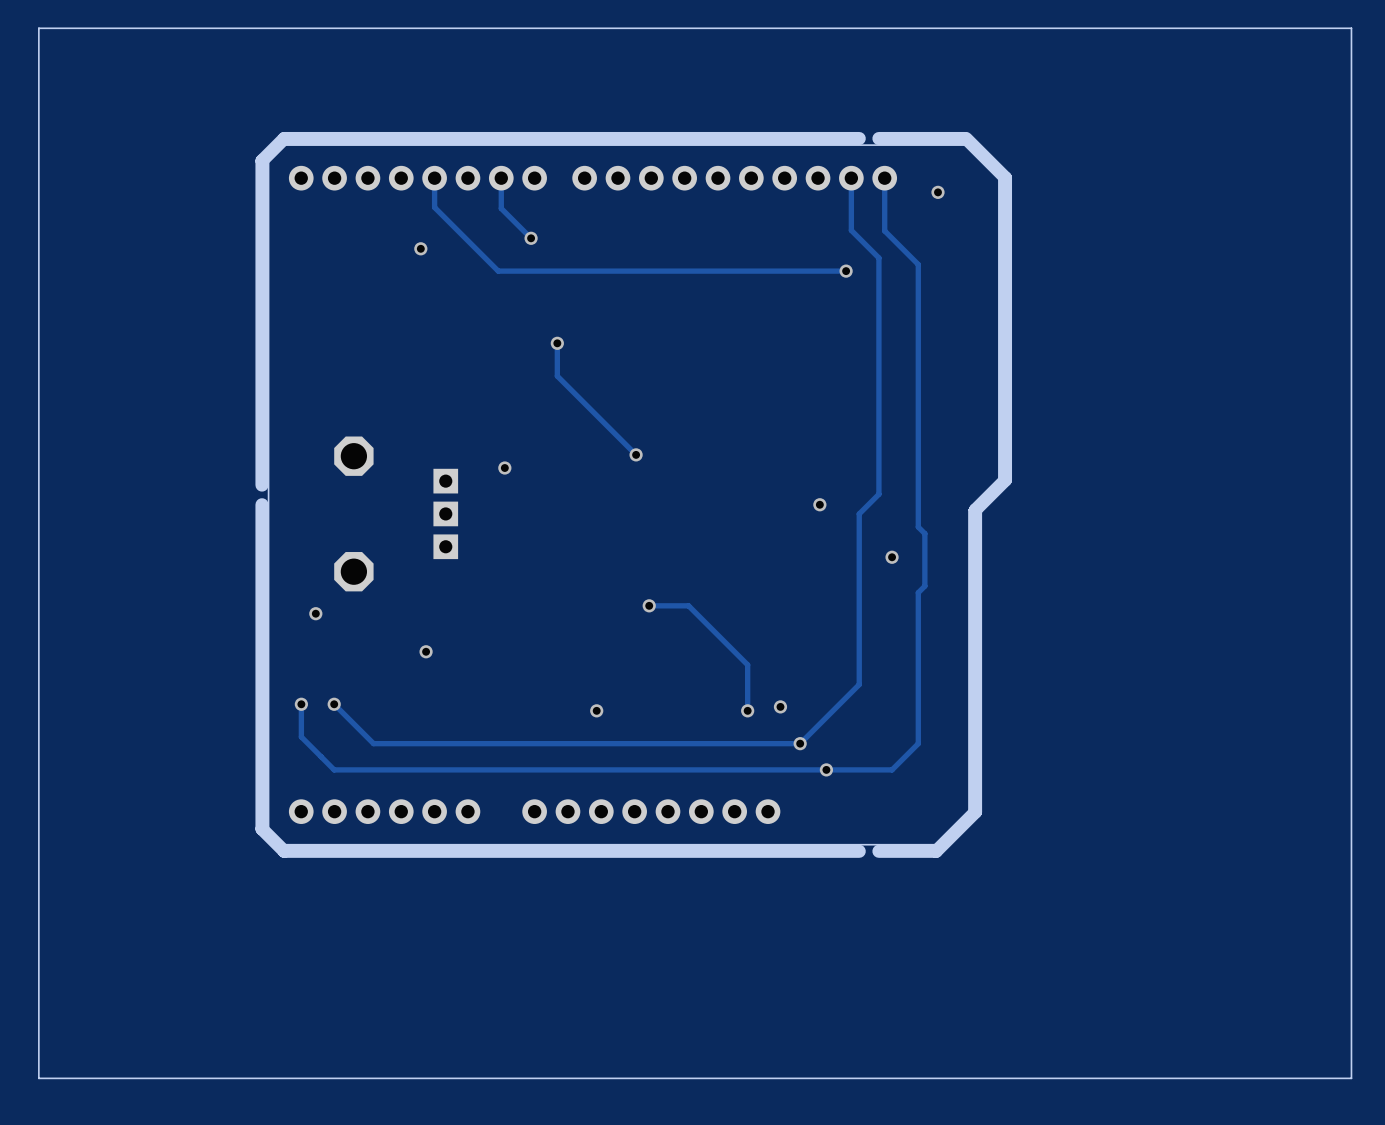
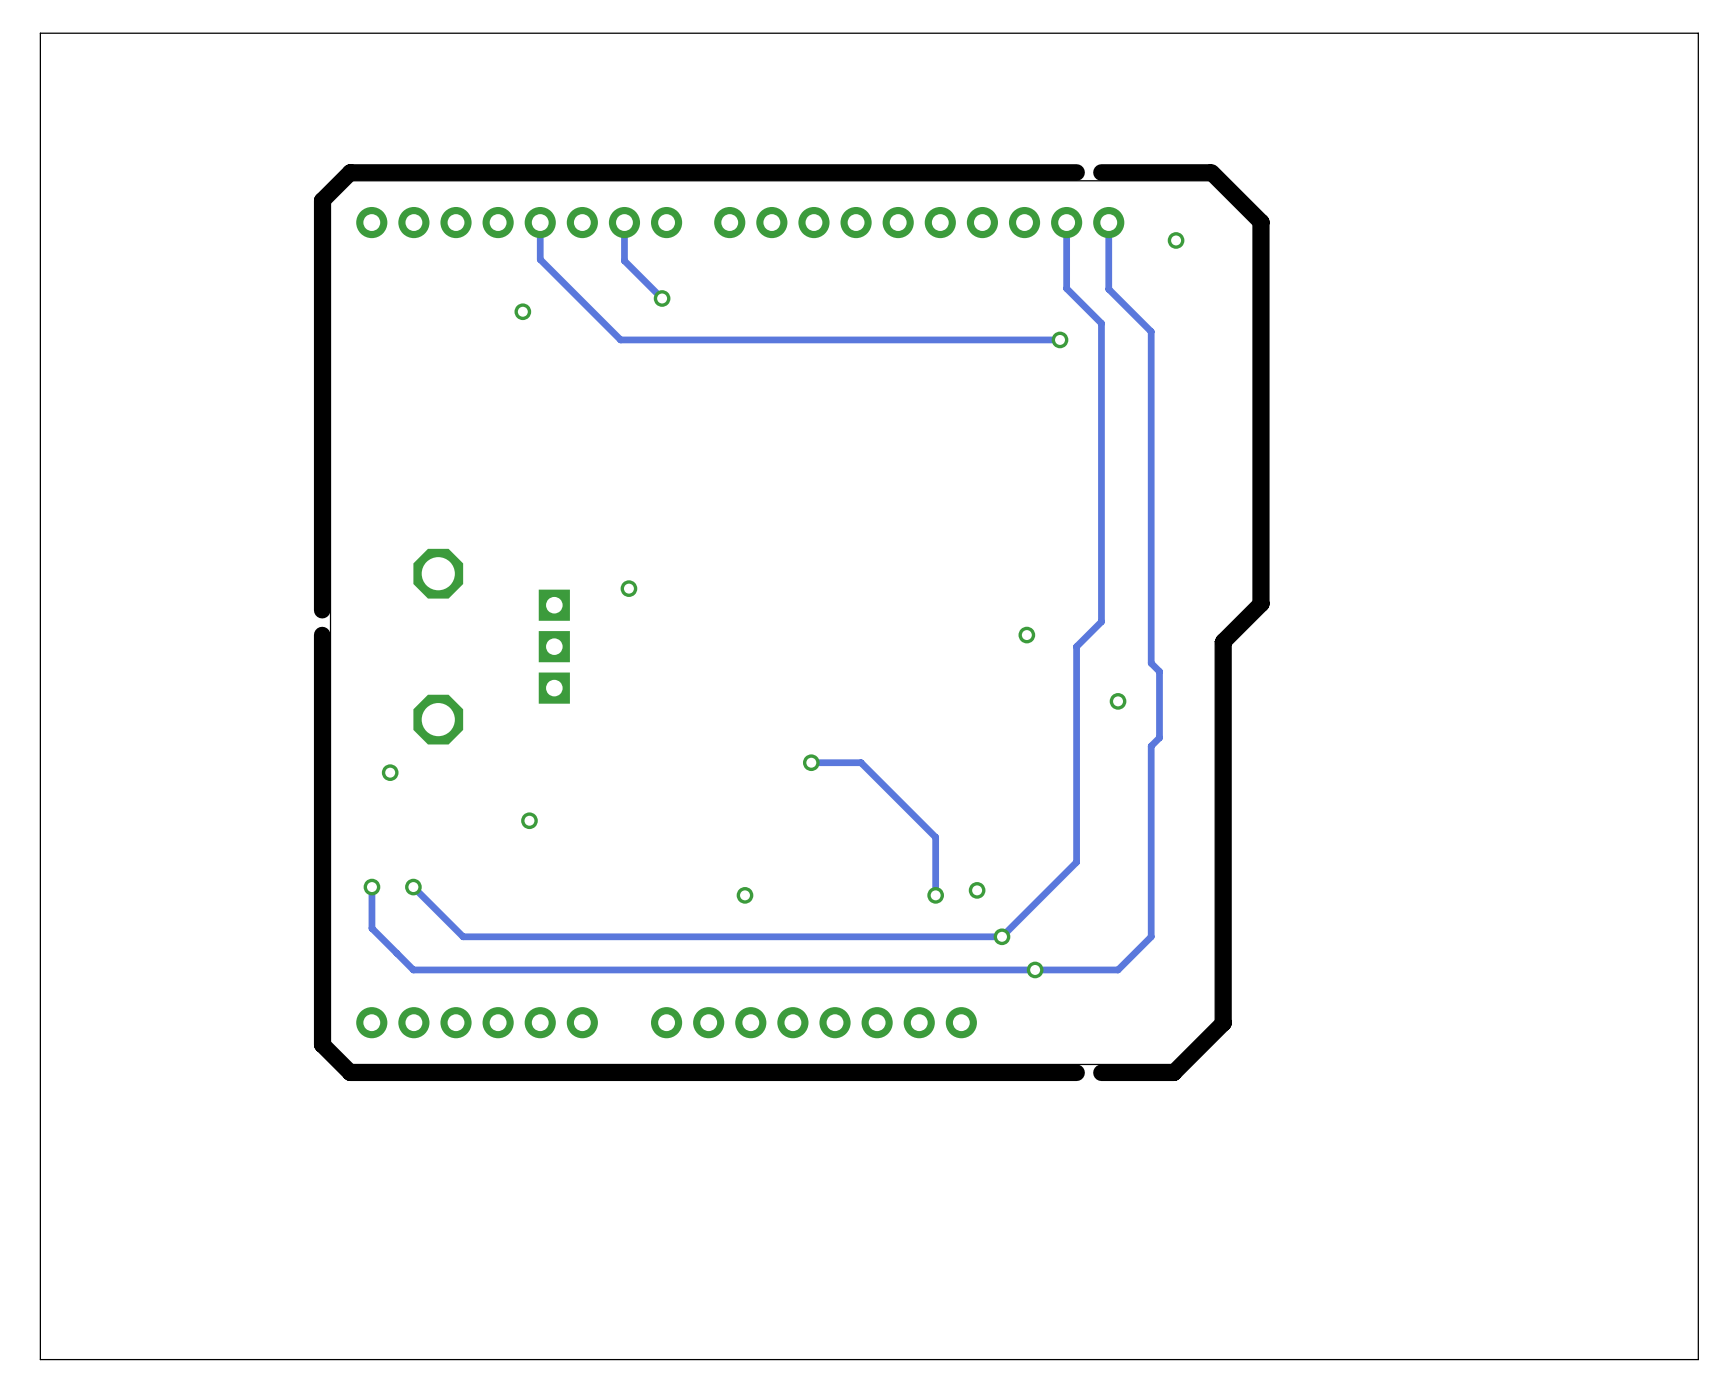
track: (557, 343) (557, 376) (636, 454) -> none
via: (557, 343) -> none
via: (636, 454) -> none

